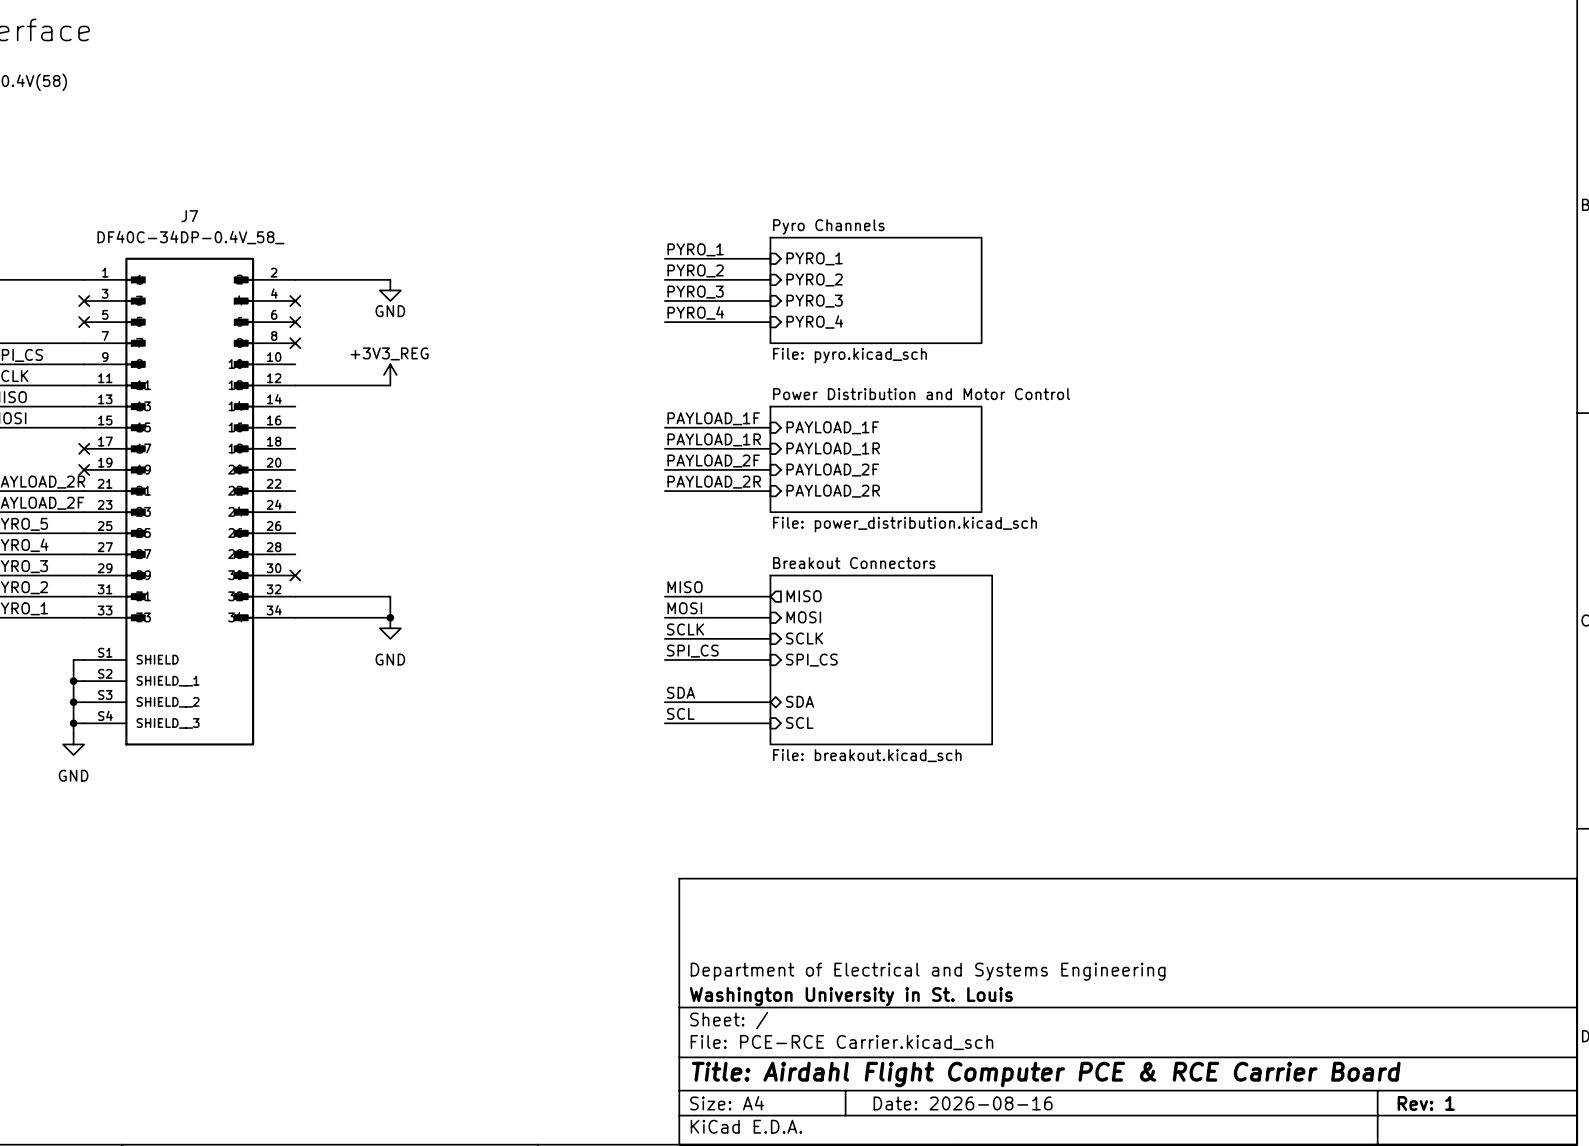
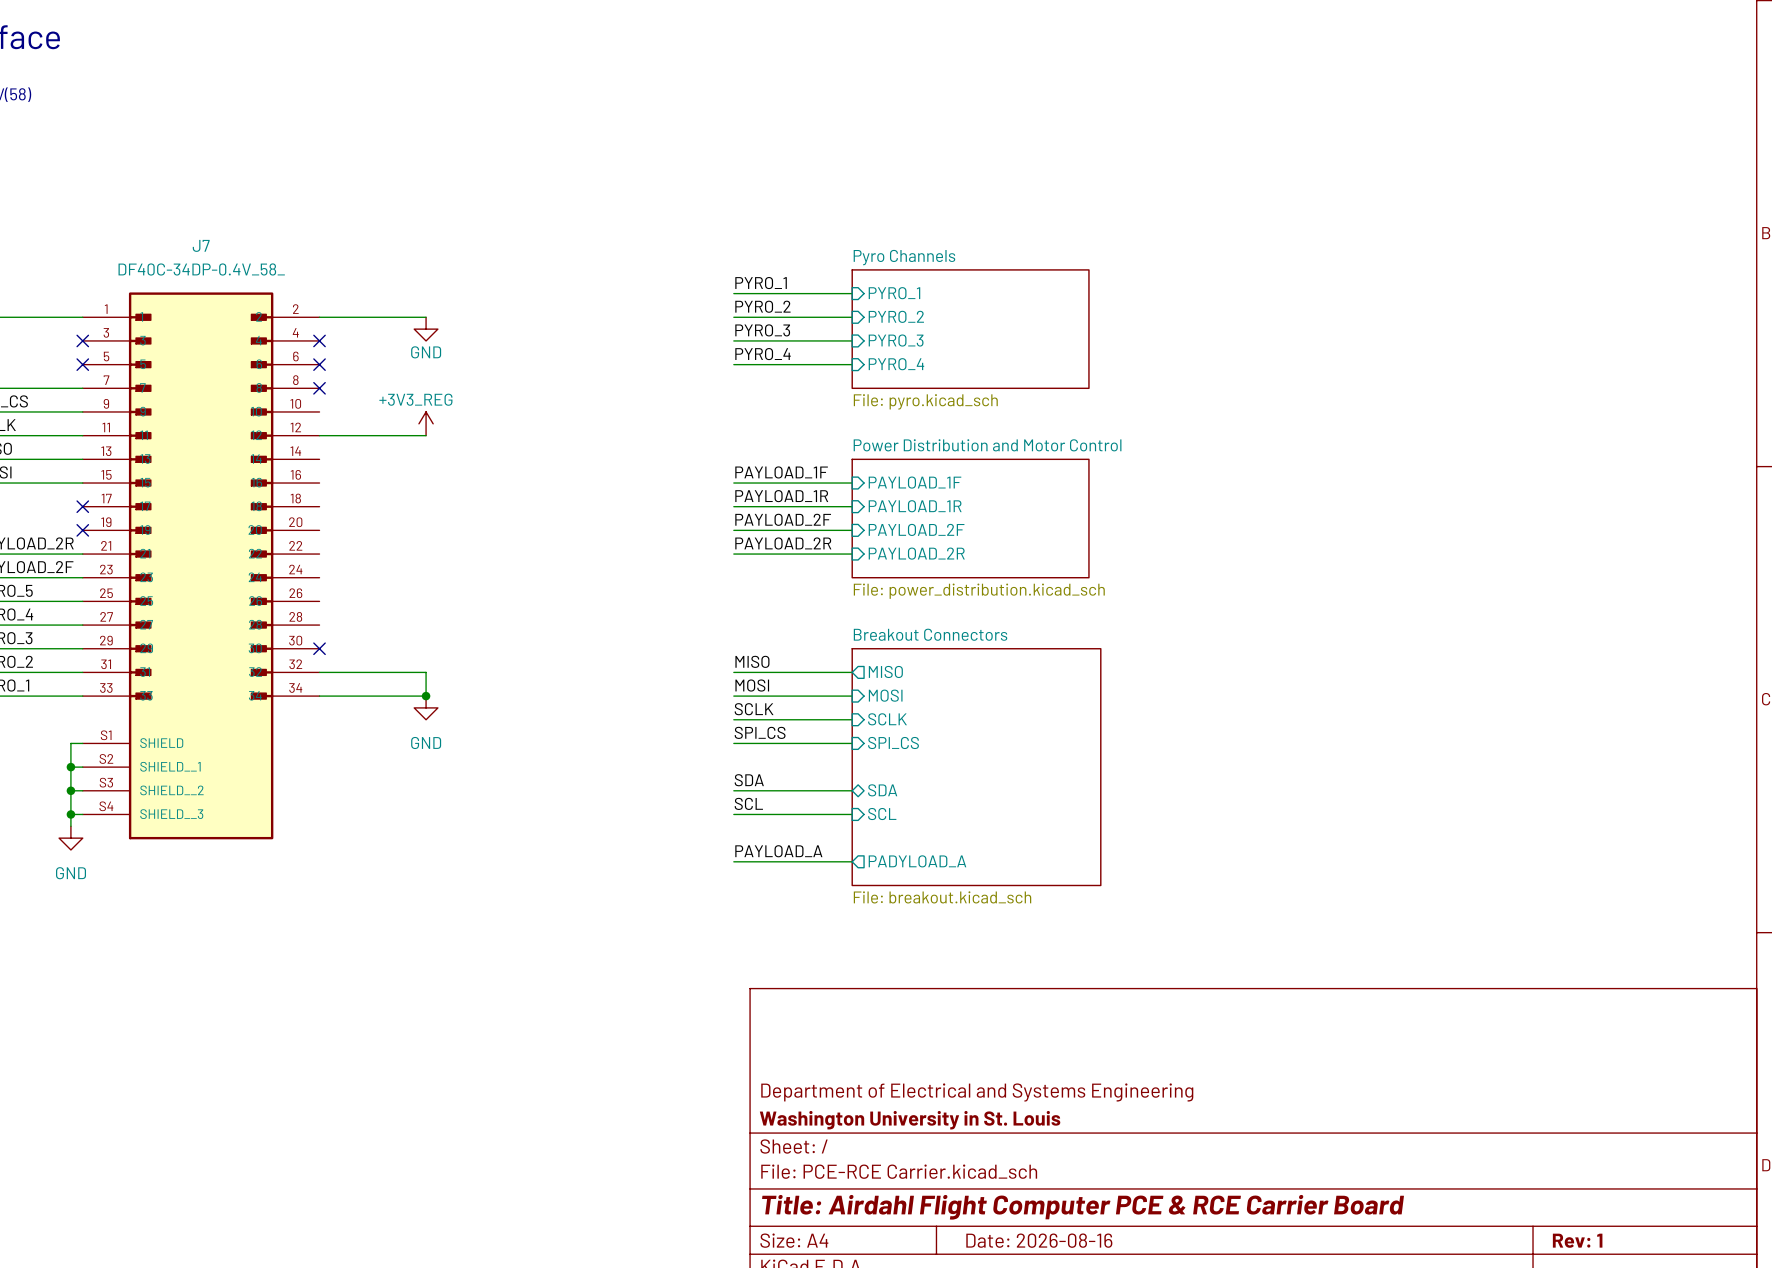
sheet Breakout Connectors: File: breakout.kicad_sch (881, 659) -> none
sheet Breakout Connectors: none -> File: breakout.kicad_sch (976, 767)
label: none -> PAYLOAD_A (778, 851)
wire: none -> (733, 861) (852, 861)
sheet pin: none -> PADYLOAD_A (917, 861)

